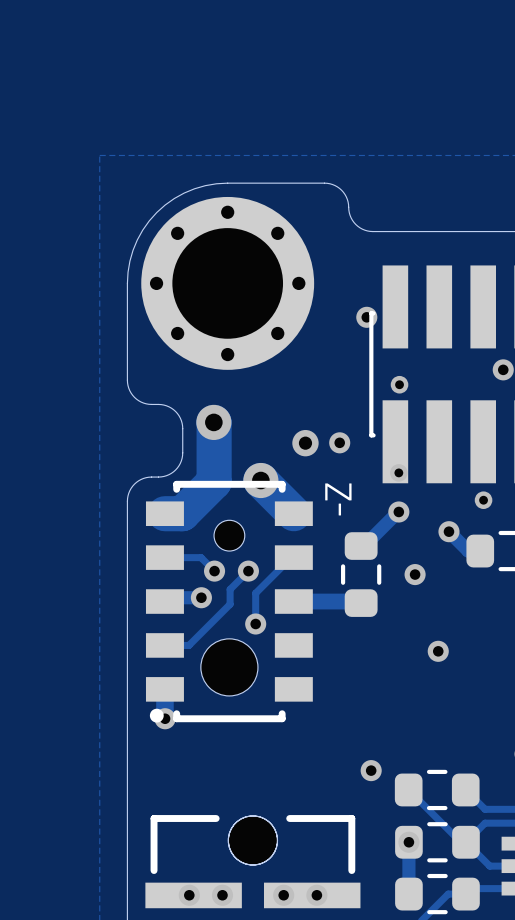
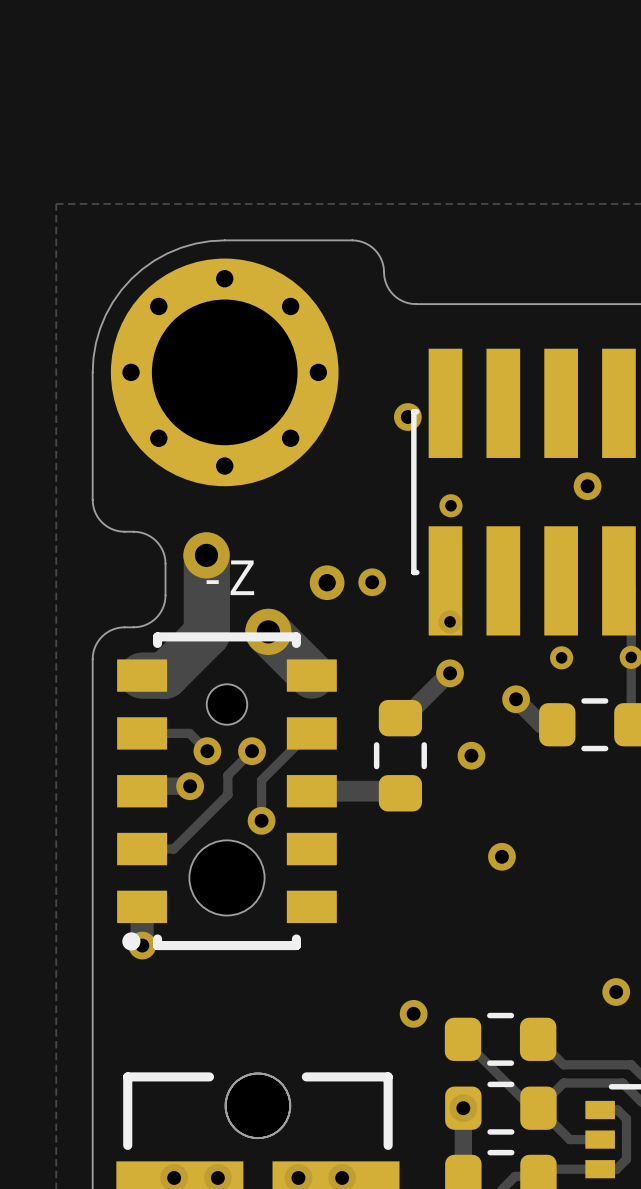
text rotation: 0° (338, 499) -> 90° clockwise (230, 577)
text position: -Z (338, 499) -> -Z (230, 577)

